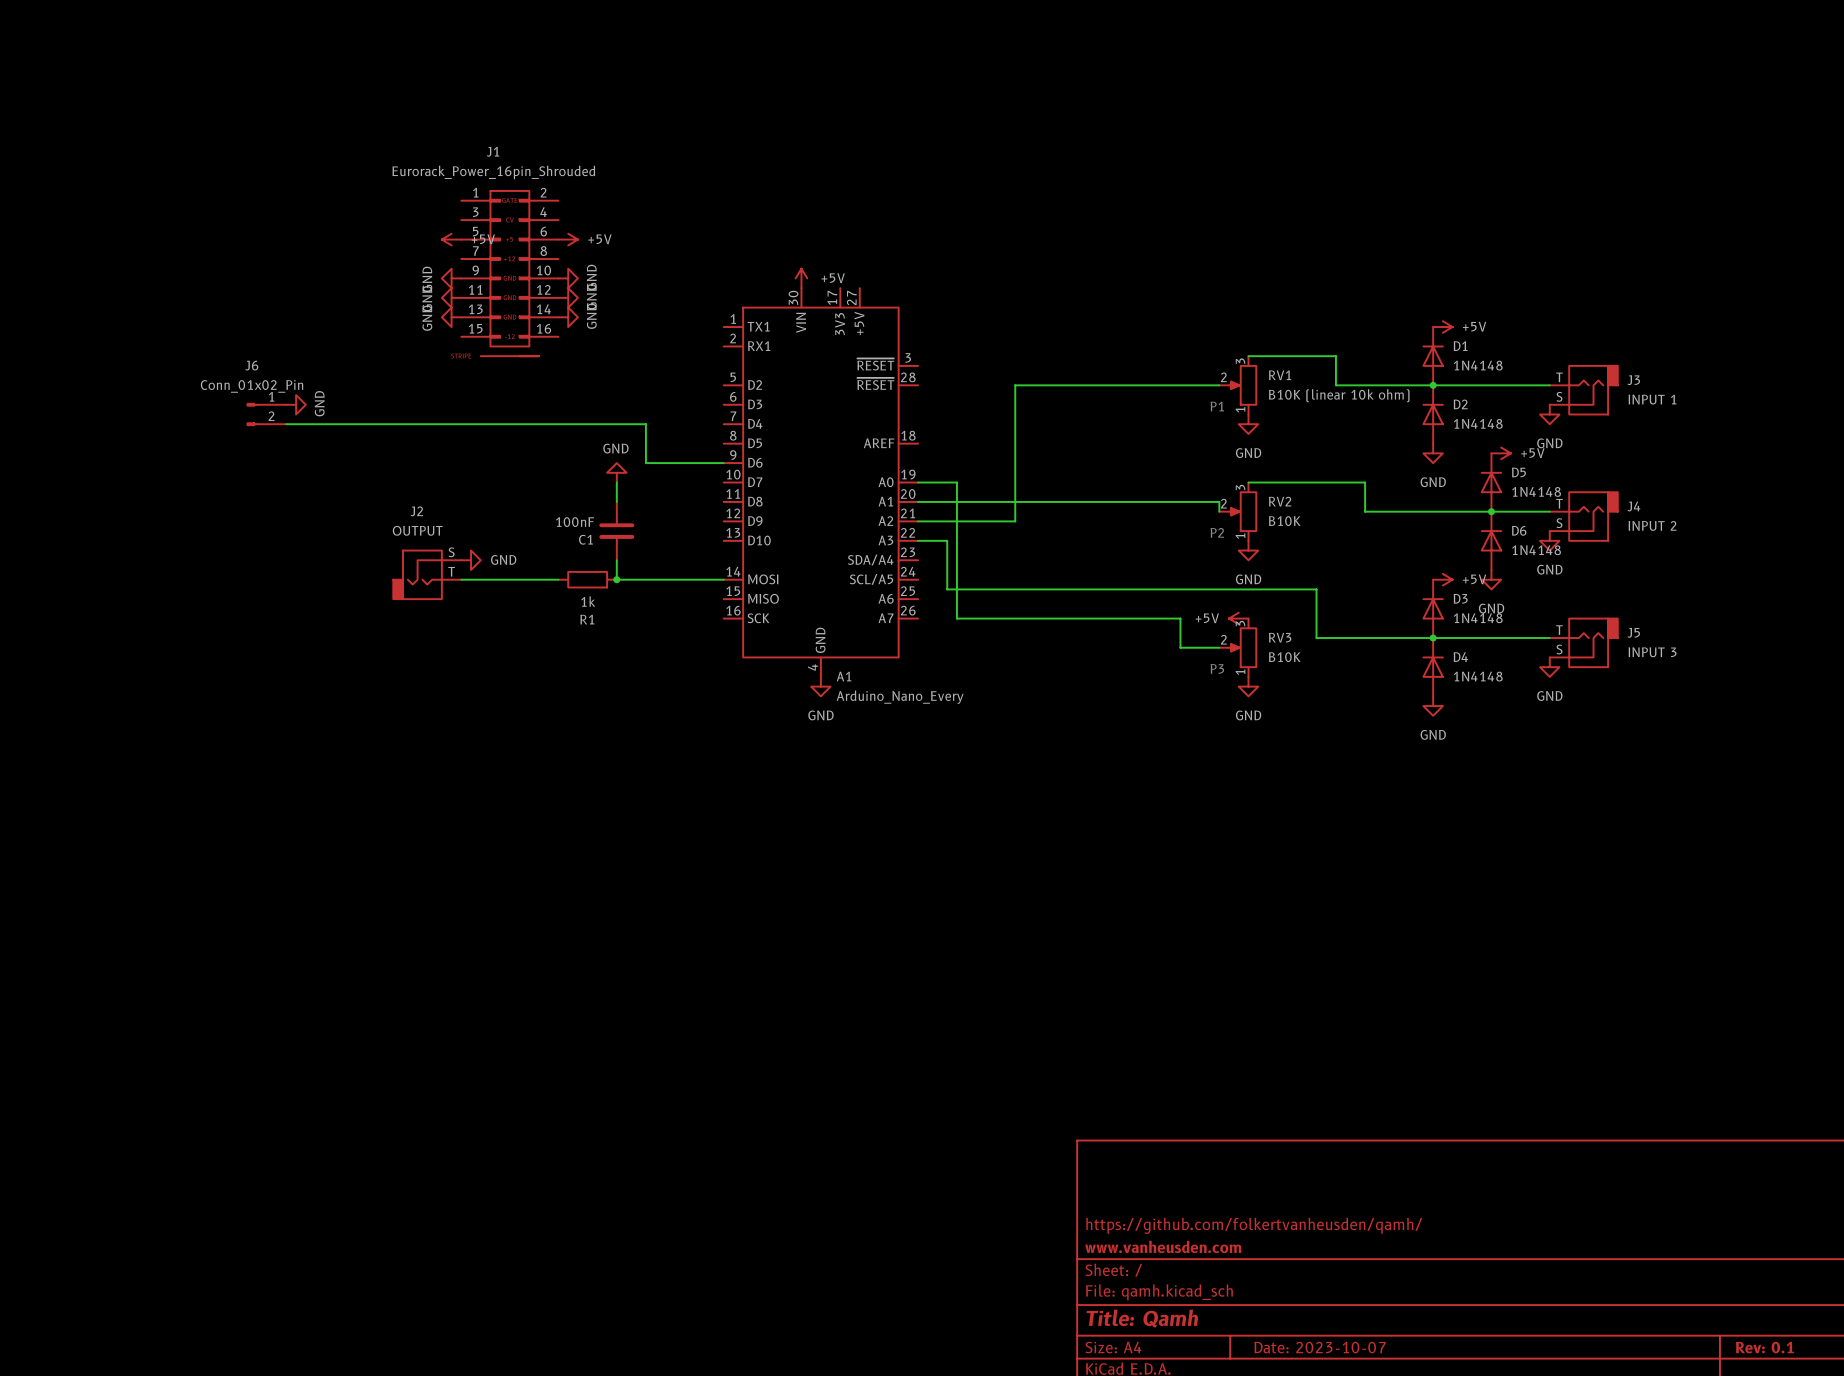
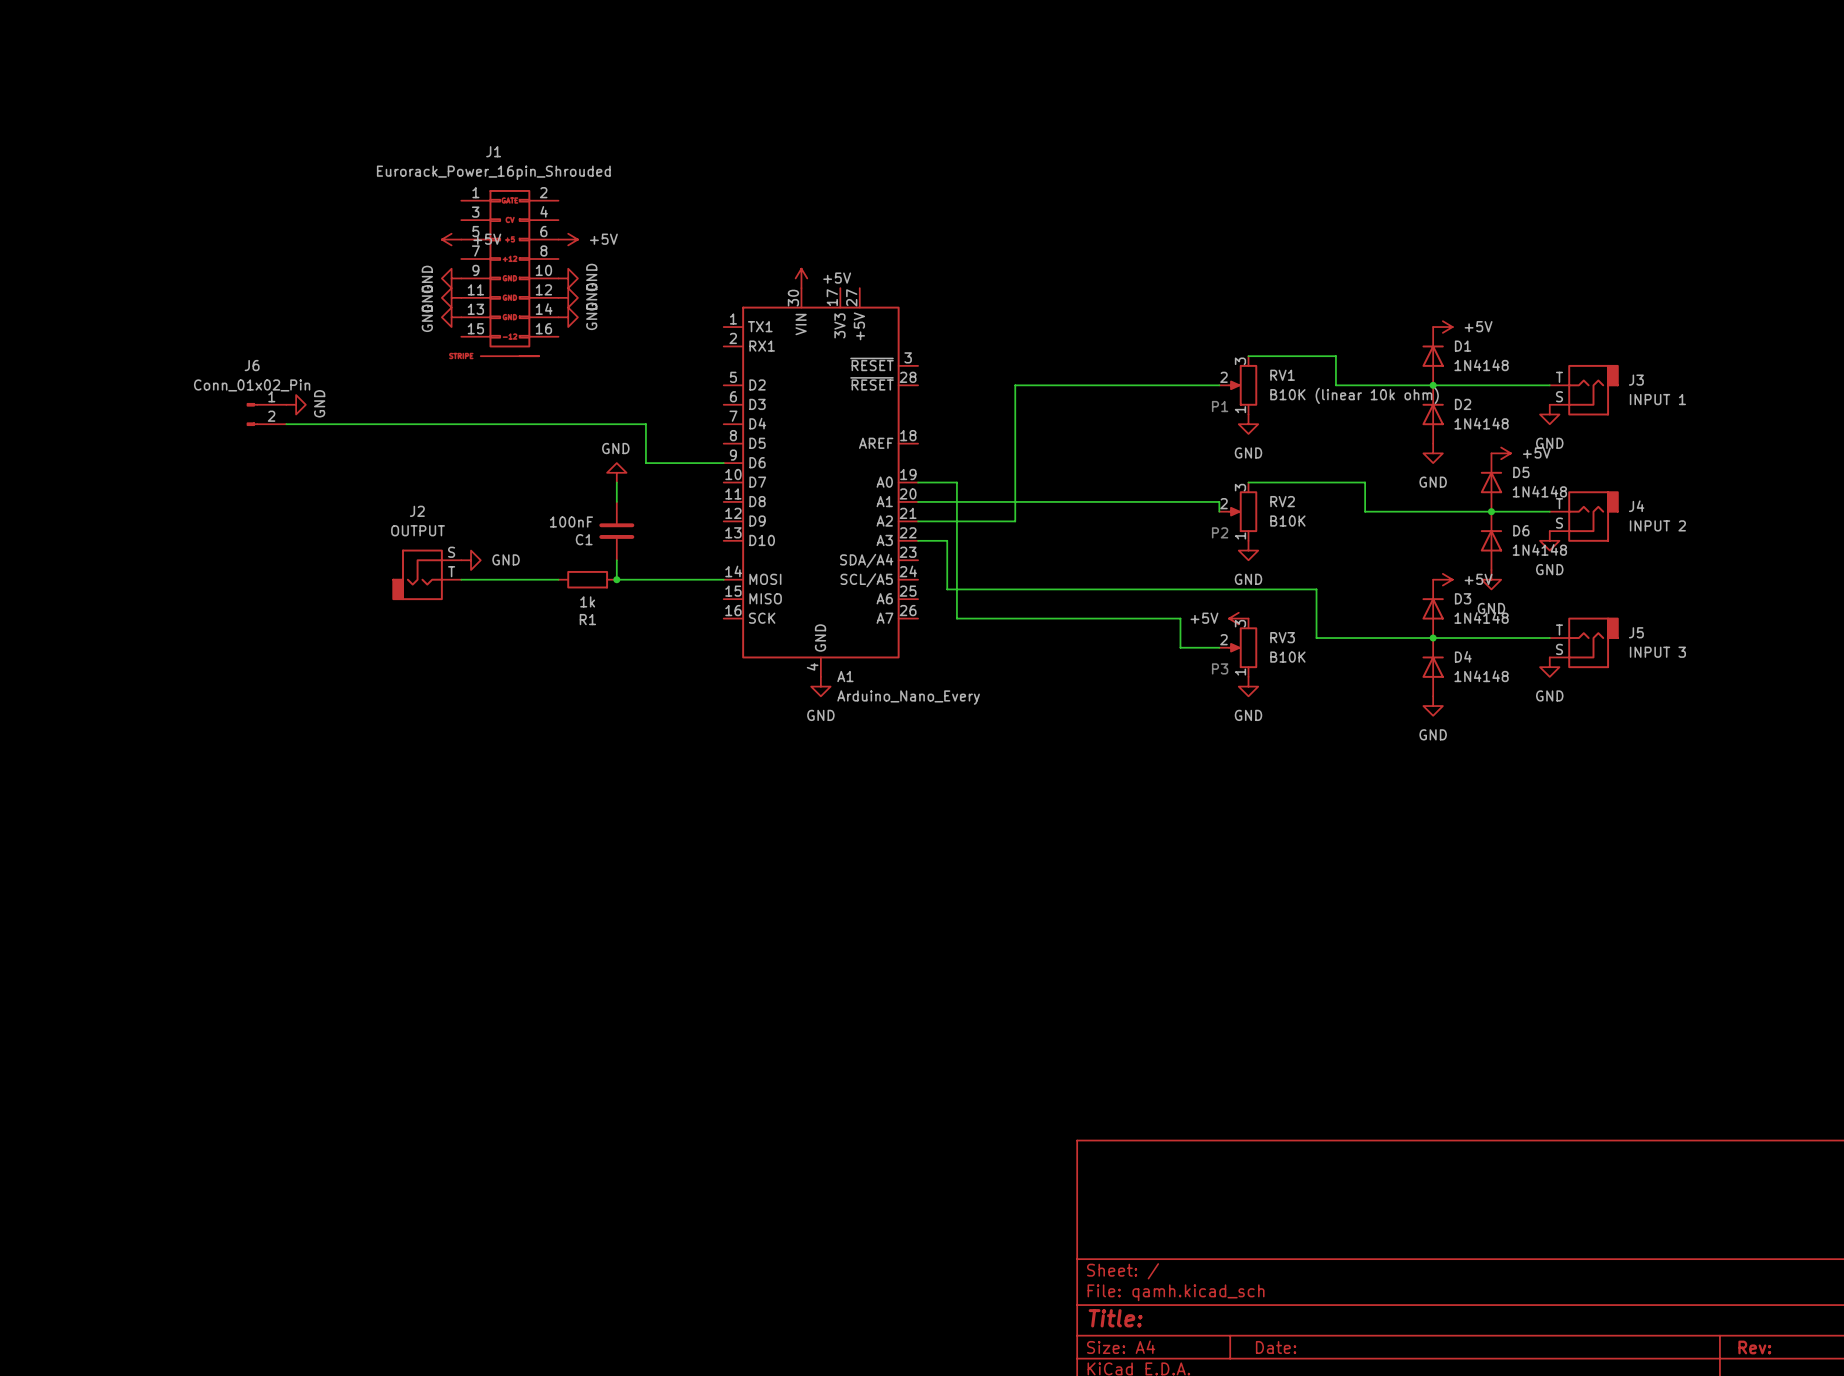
title block: https://github.com/folkertvanheusden/qamh/ (1254, 1225) -> none
title block: www.vanheusden.com (1163, 1246) -> none
title block: Title: Qamh (1142, 1318) -> Title: (1115, 1318)
title block: Date: 2023-10-07 (1320, 1347) -> Date: (1276, 1347)
title block: Rev: 0.1 (1764, 1347) -> Rev: (1754, 1347)

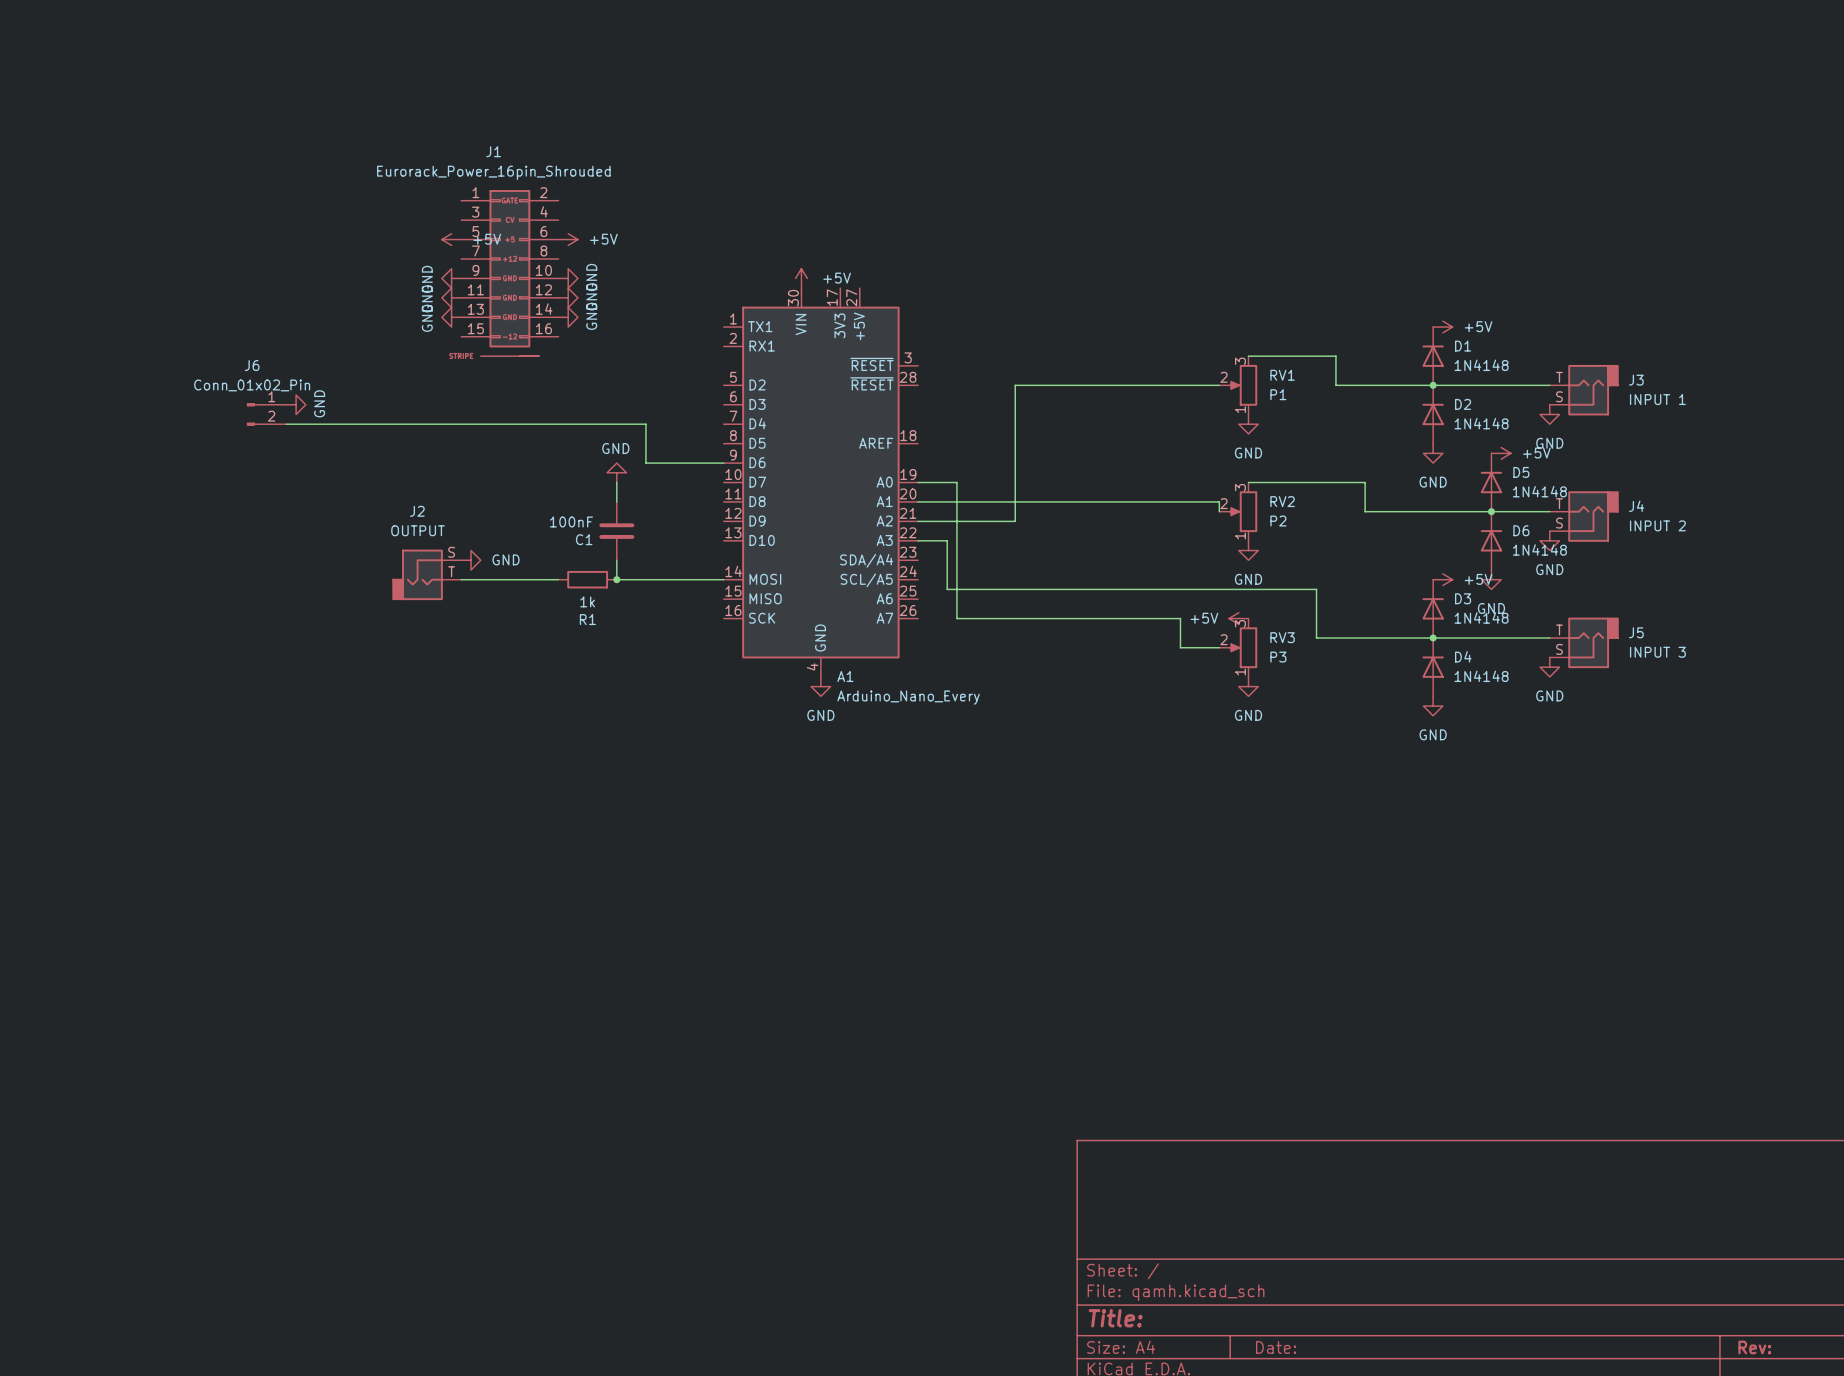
RV1 value: B10K (linear 10k ohm) (1354, 395) -> P1 (1278, 394)
text: P1 (1220, 406) -> none
RV2 value: B10K (1287, 521) -> P2 (1278, 521)
text: P2 (1220, 532) -> none
RV3 value: B10K (1287, 657) -> P3 (1278, 657)
text: P3 (1220, 668) -> none

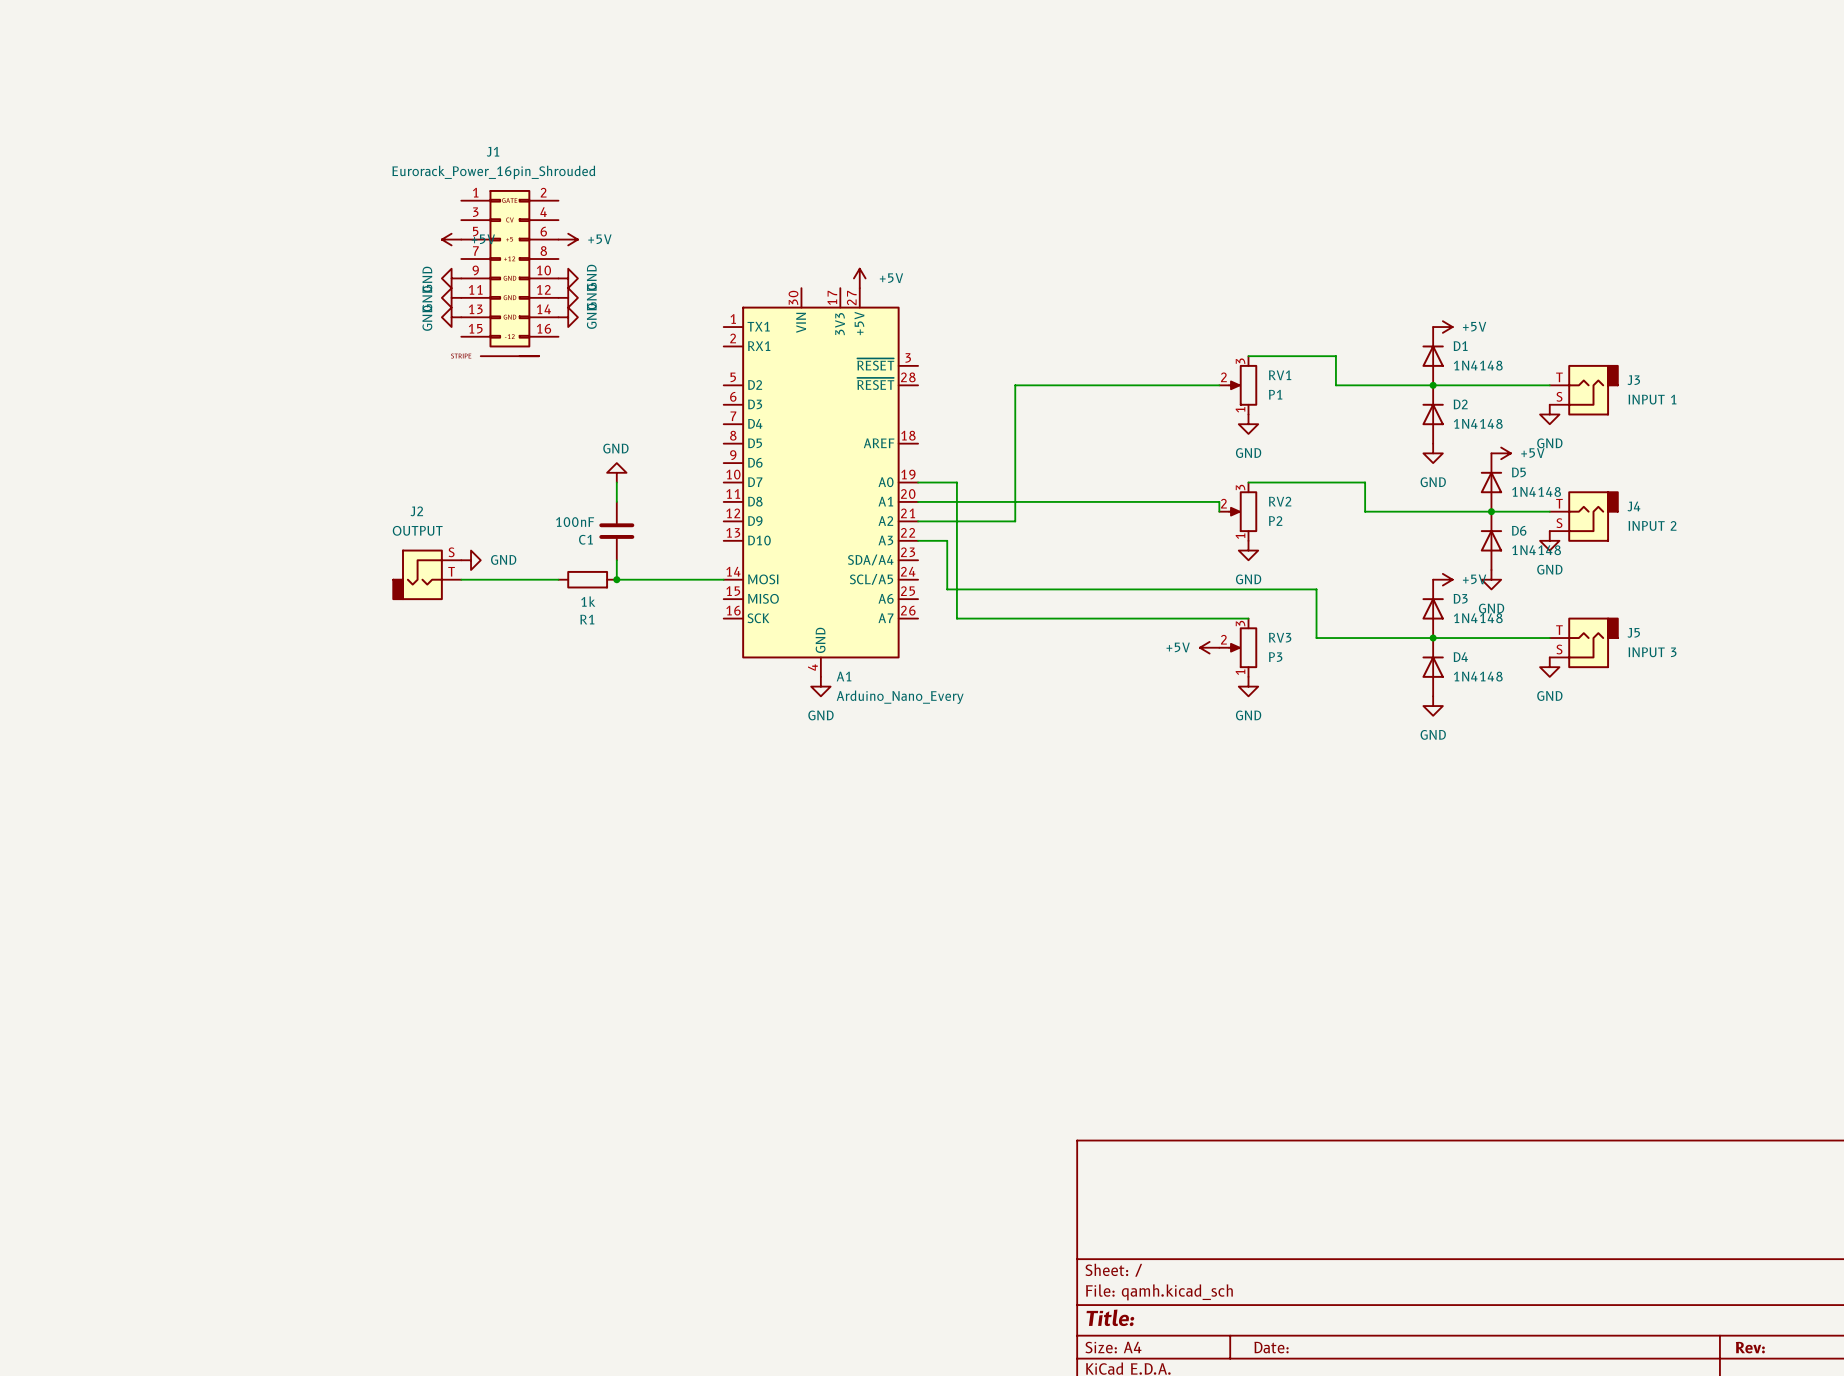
power symbol position: +5V (801, 278) -> +5V (859, 278)
power symbol: GND (296, 404) -> none
J6: Conn_01x02_Pin (266, 414) -> none
wire: (286, 424) (645, 424) (645, 463) (723, 463) -> none
wire: (1180, 618) (1180, 647) (1219, 647) -> (1180, 618) (1248, 618)
power symbol position: +5V (1238, 618) -> +5V (1209, 647)

